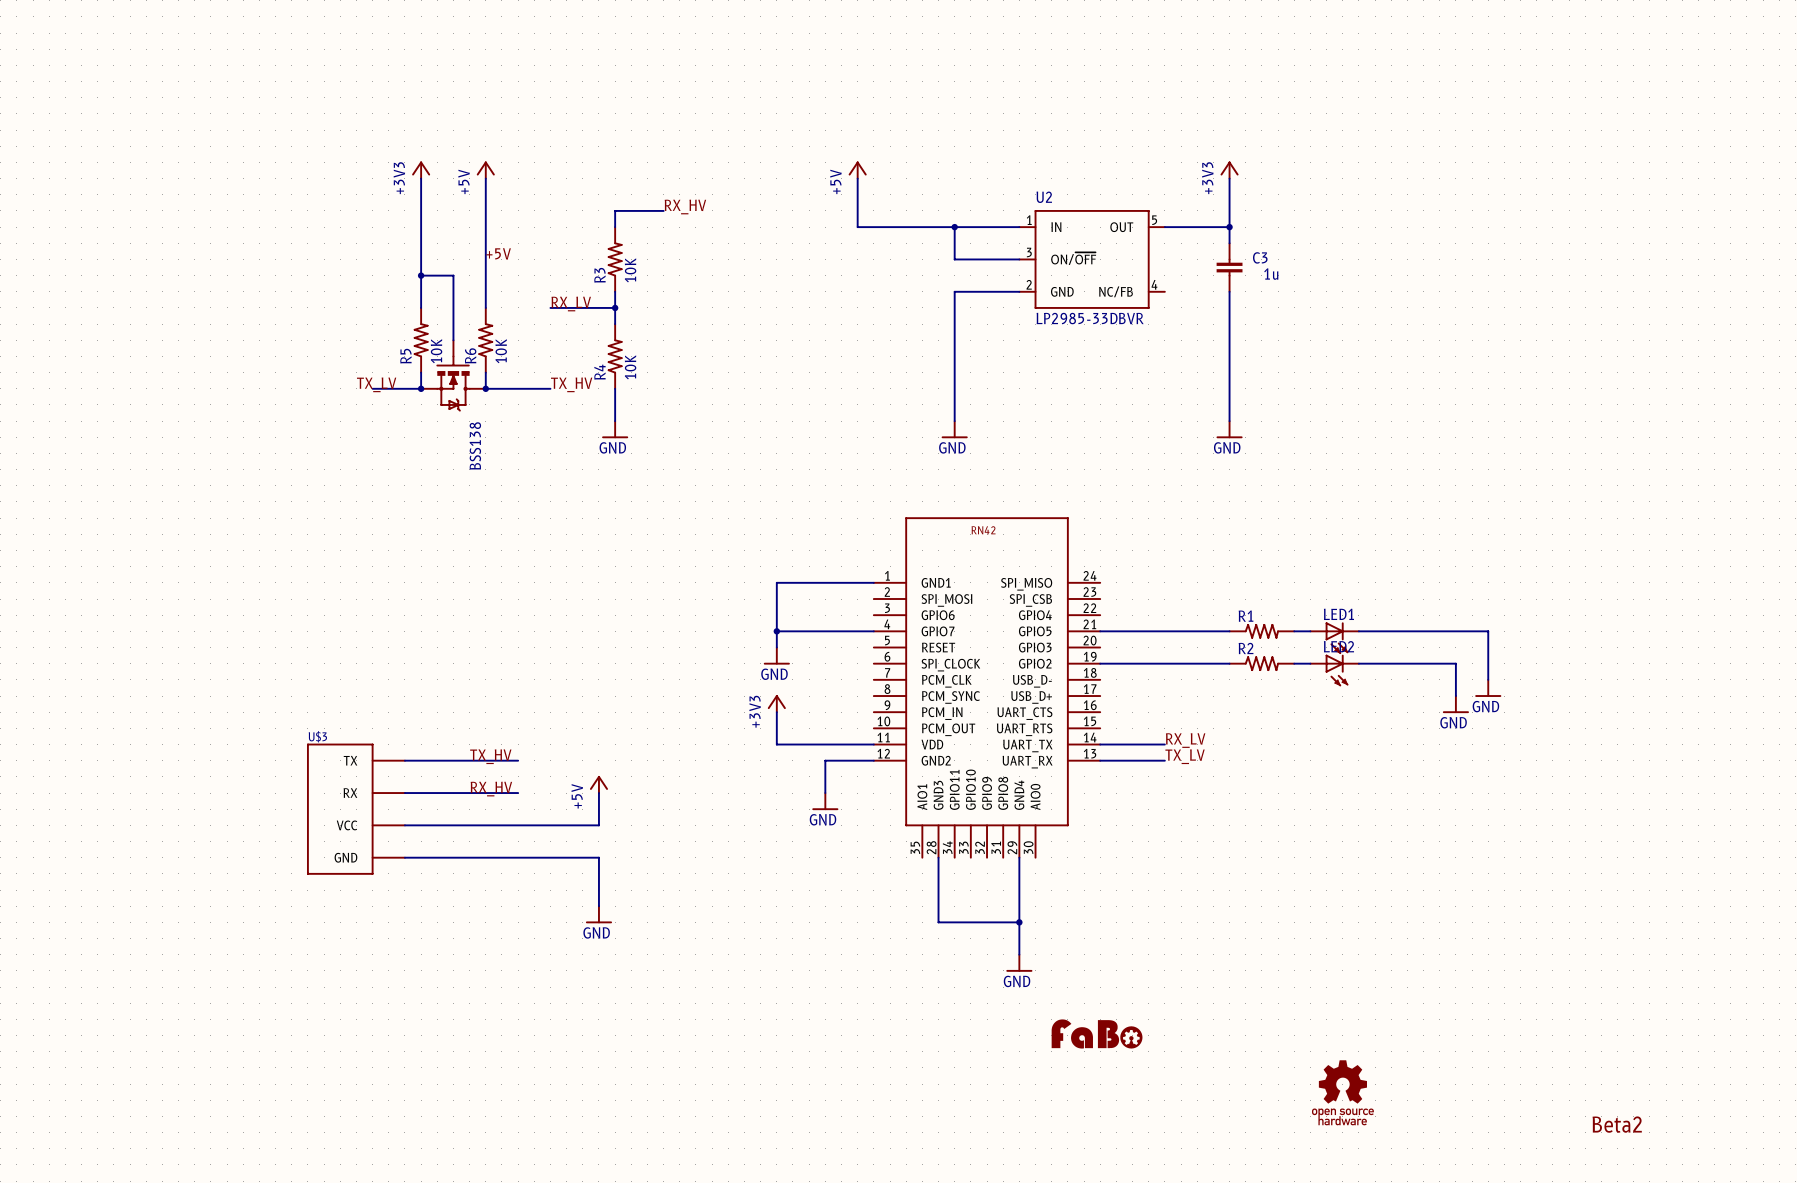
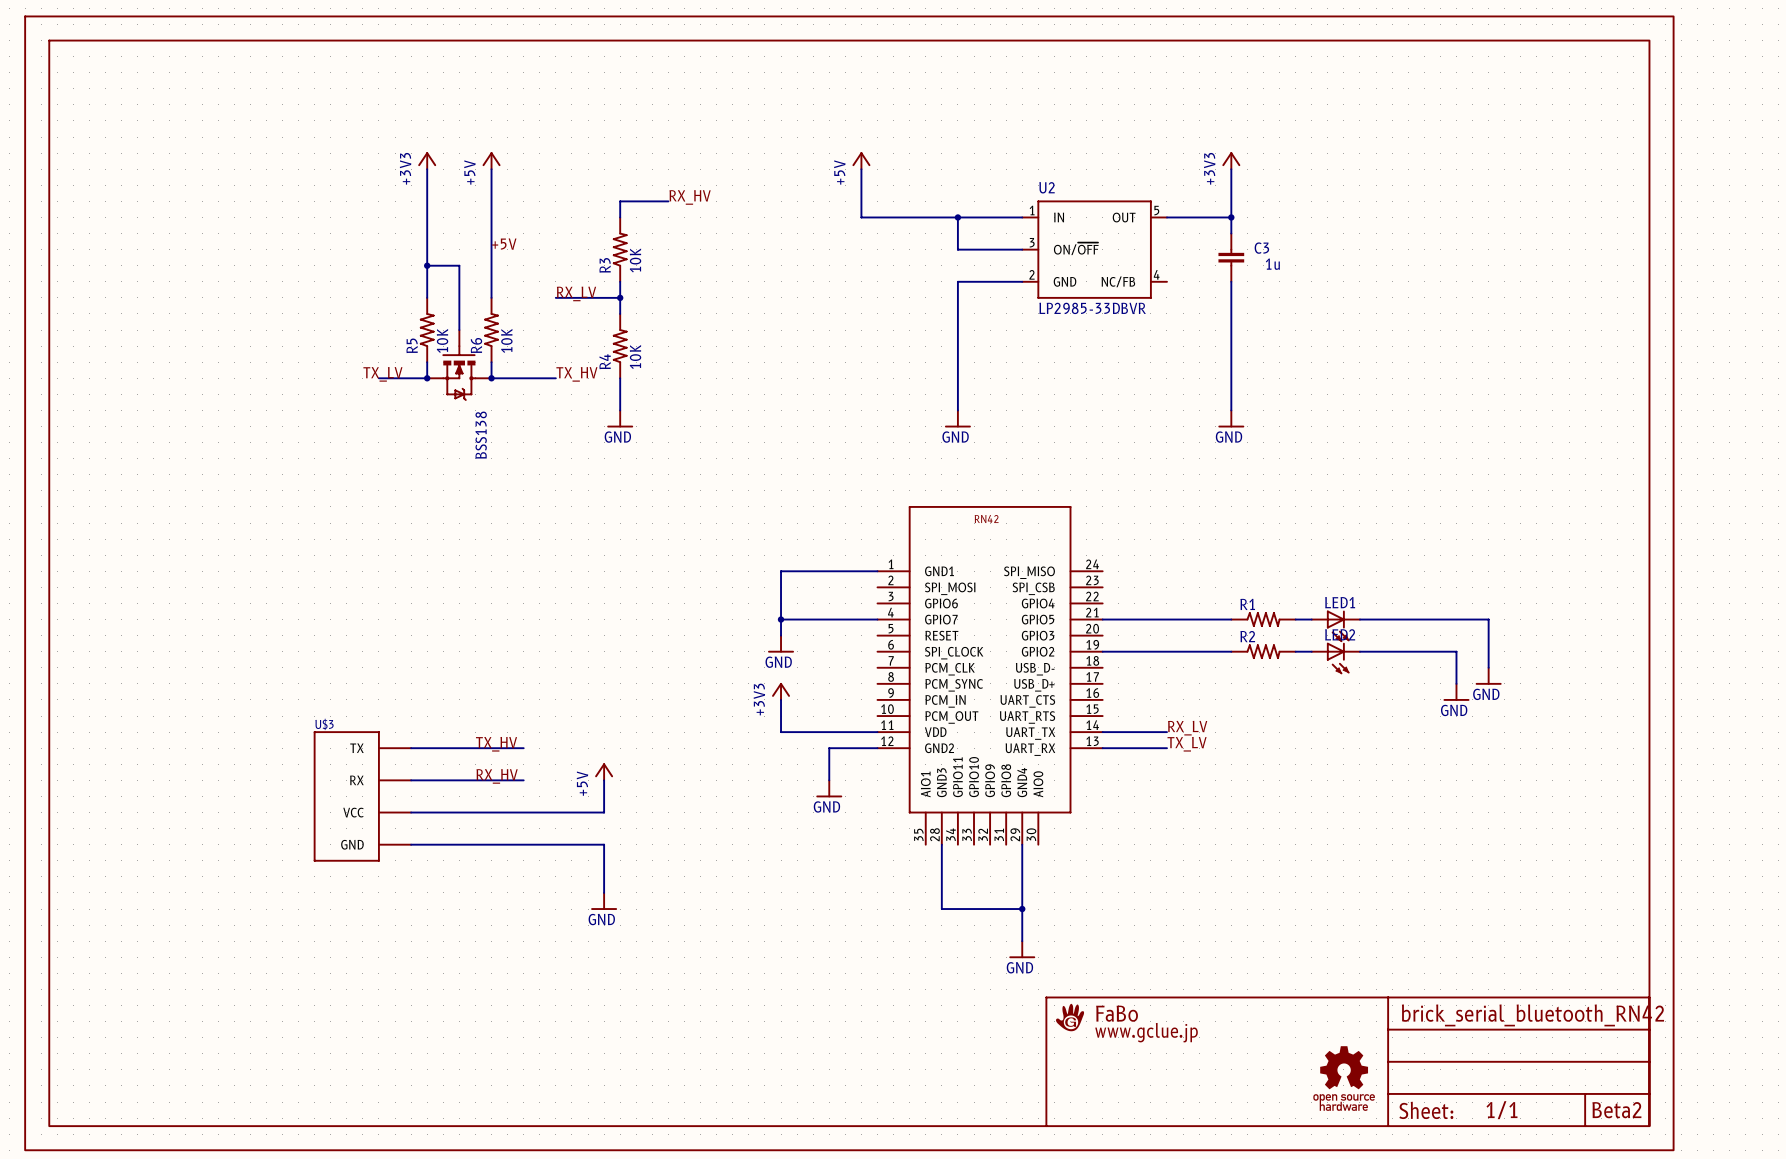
part: none -> (849, 583)
part: (1097, 1033) -> none

